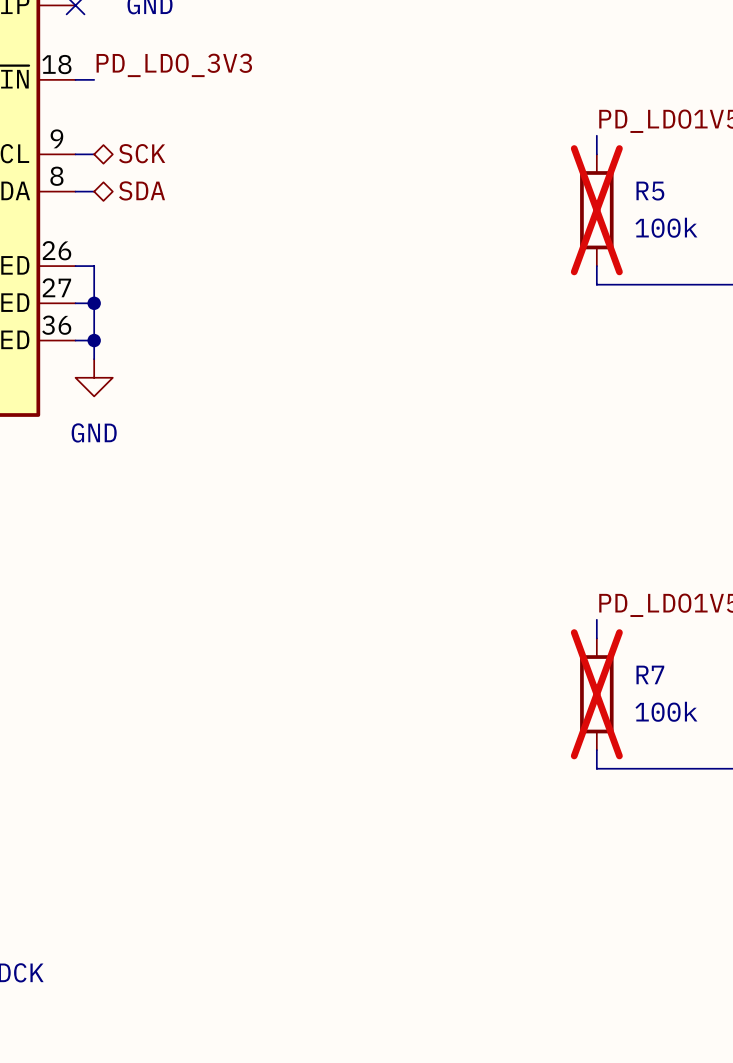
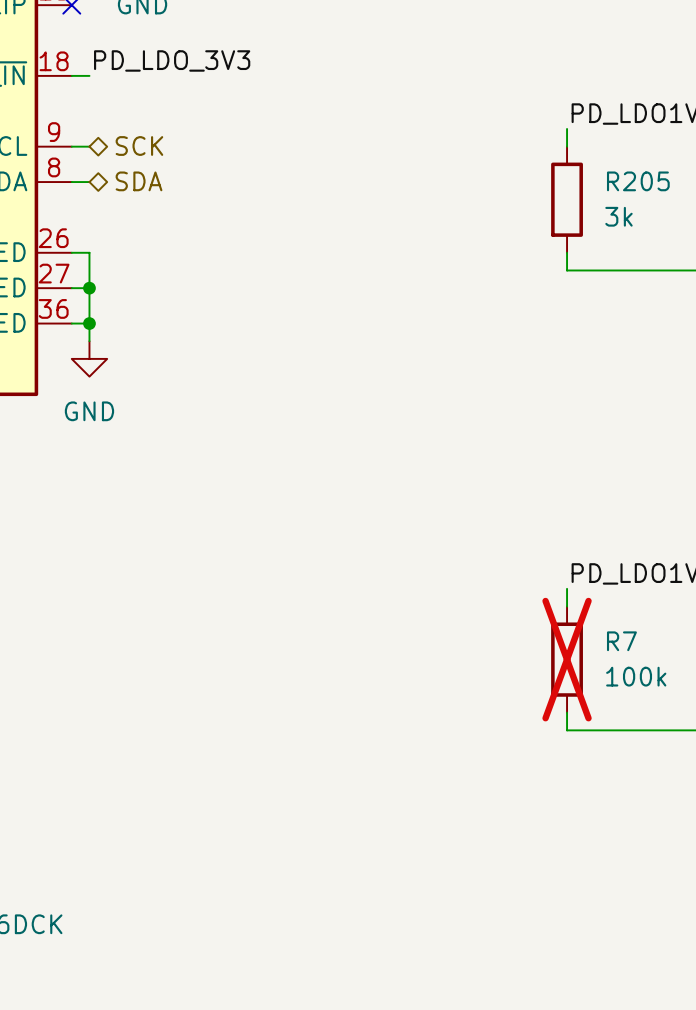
R5 name: R5 (650, 191) -> R205 (638, 181)
R5 do-not-place cross: (596, 210) -> none
R5 value: 100k (666, 227) -> 3k (618, 216)

